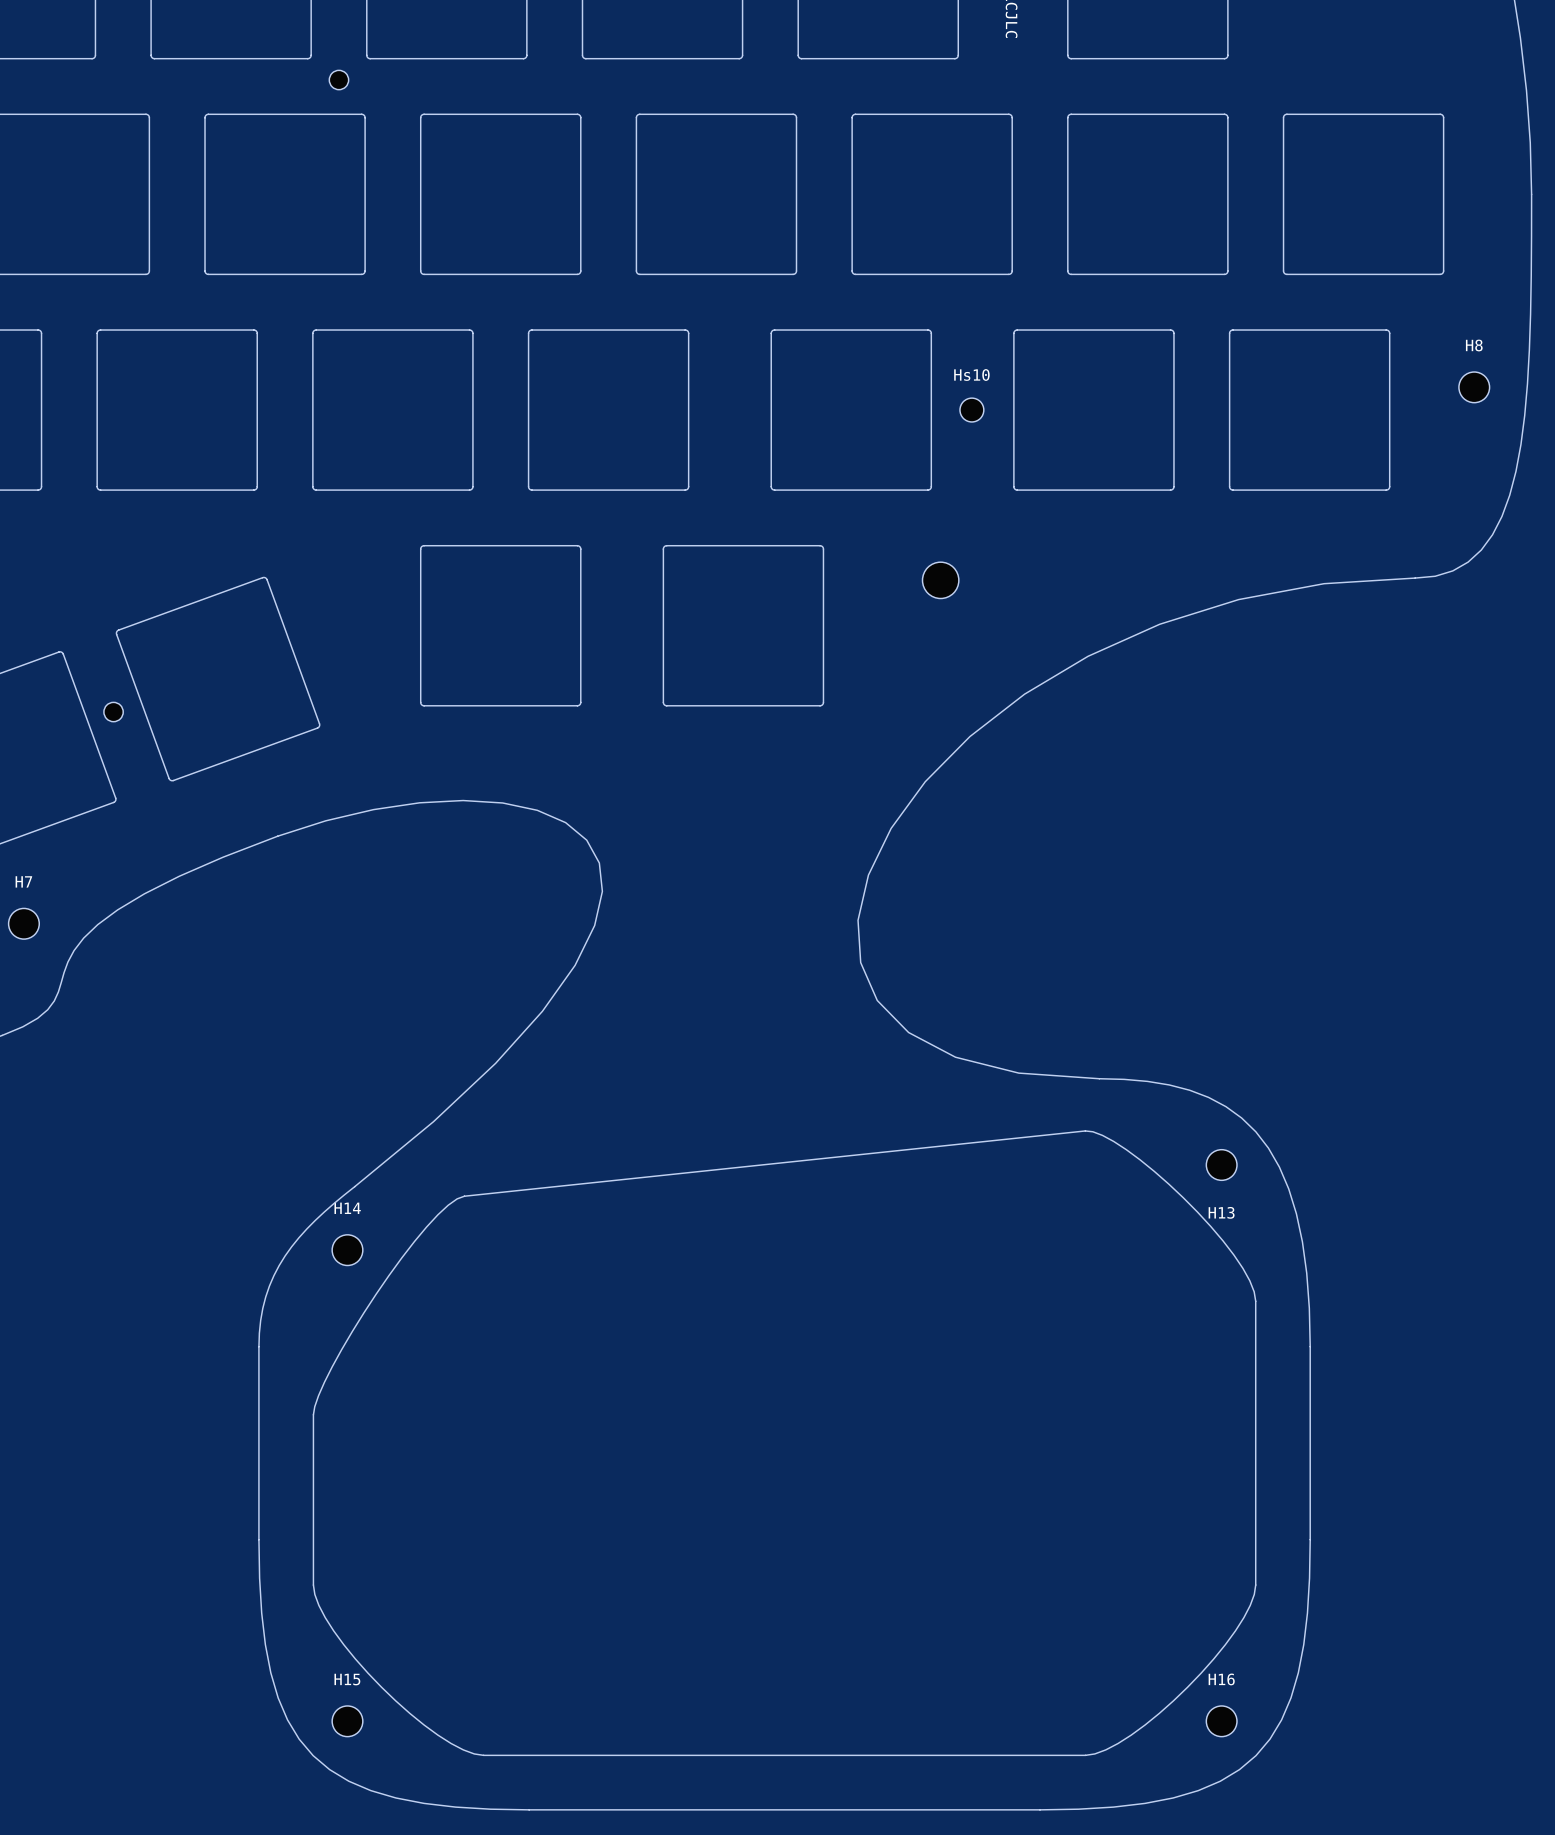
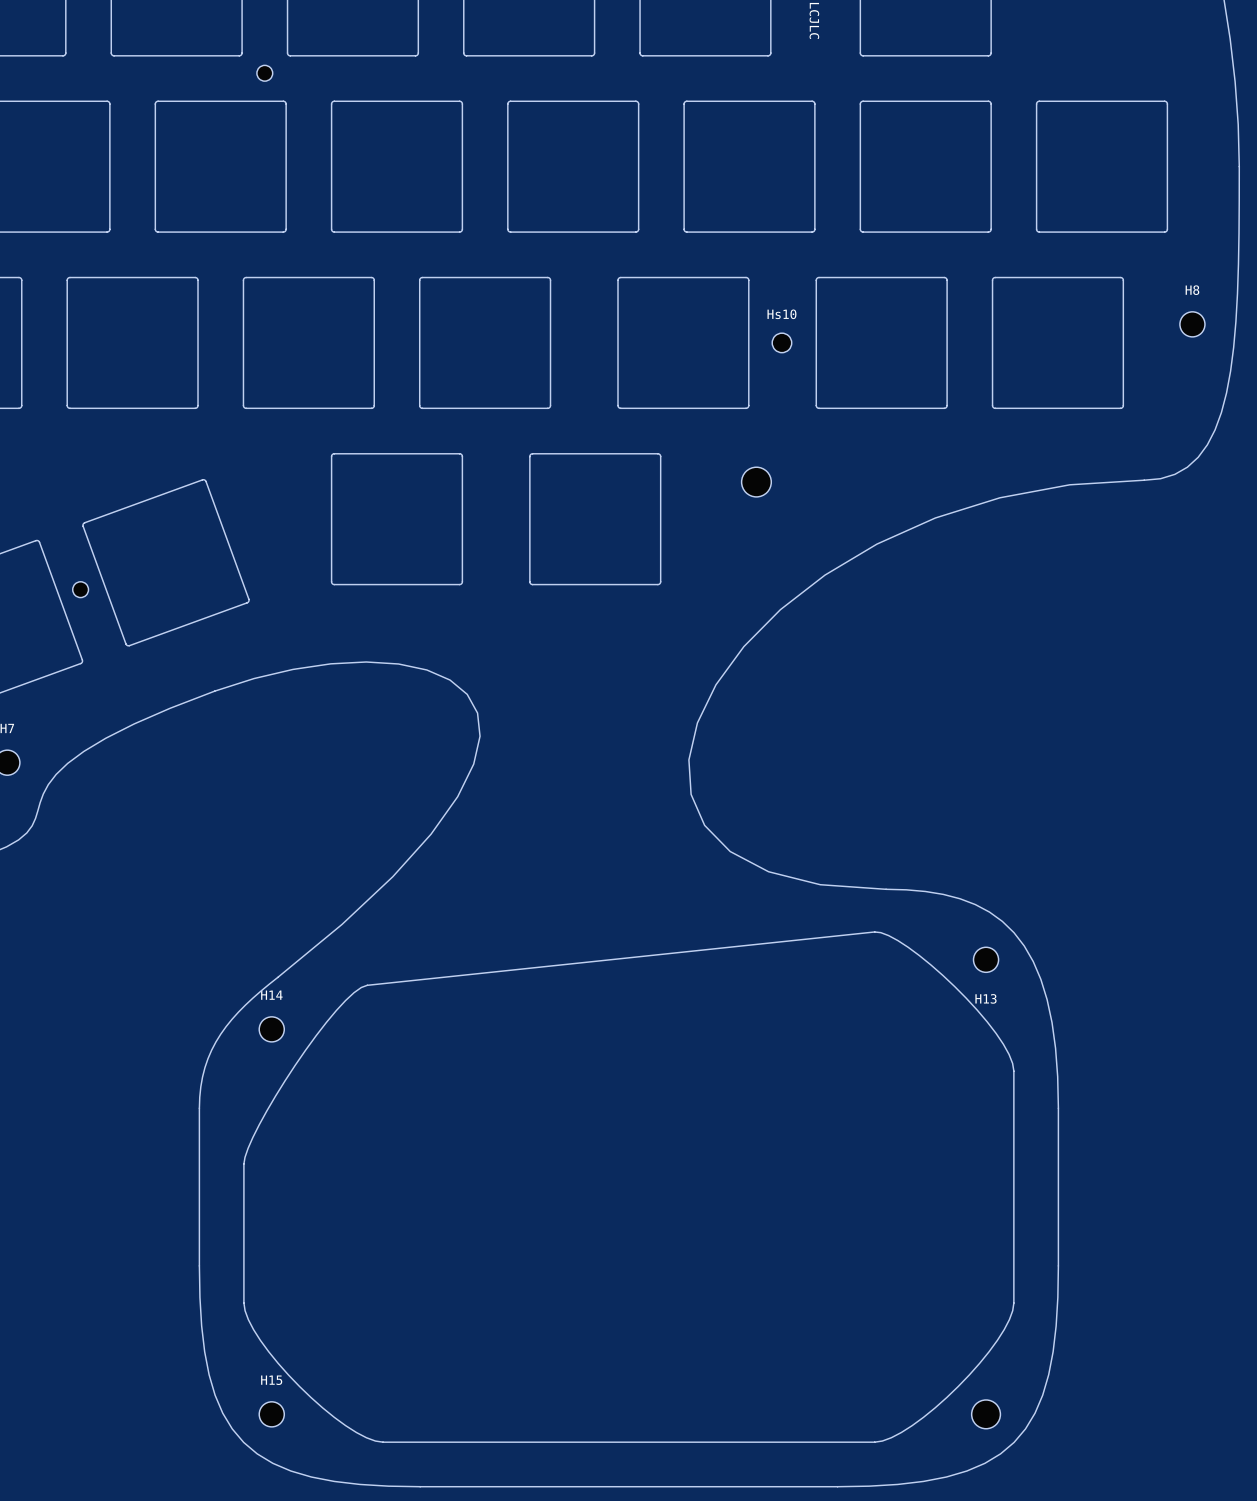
H16: (1221, 1721) -> none
part: none -> (986, 1414)

